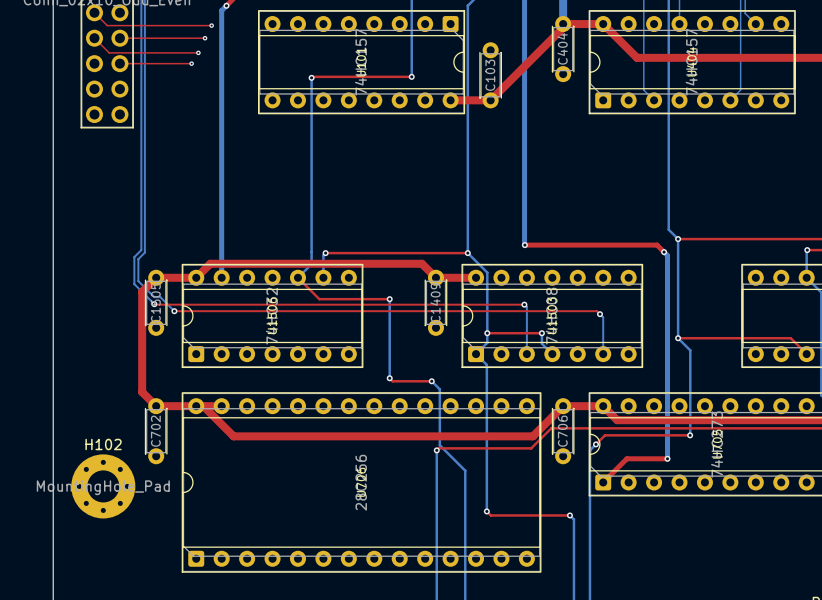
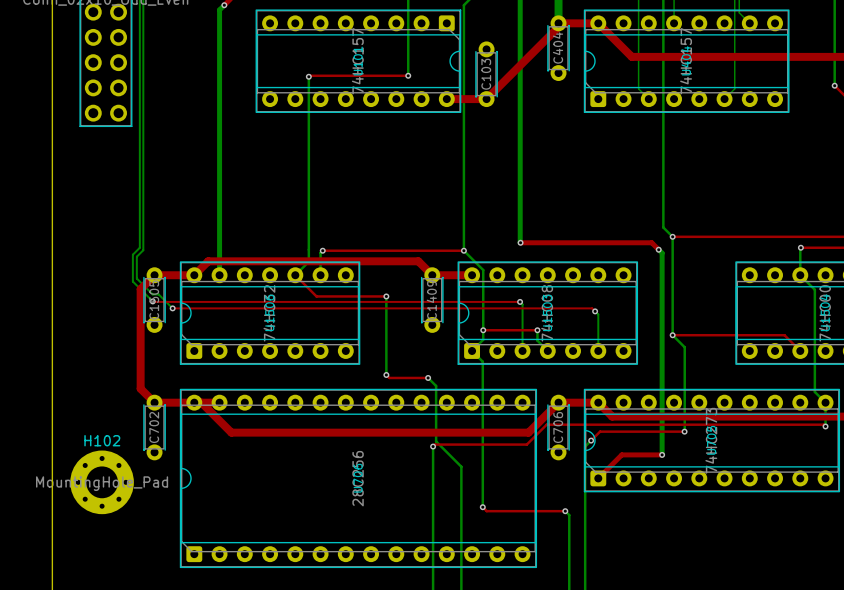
top track: (94, 12) (107, 25) (211, 25) -> none
via: (211, 25) -> none
top track: (94, 38) (109, 52) (198, 52) -> none
top track: (119, 38) (205, 38) -> none
via: (205, 38) -> none
via: (198, 52) -> none
top track: (119, 63) (191, 63) -> none
via: (191, 63) -> none

